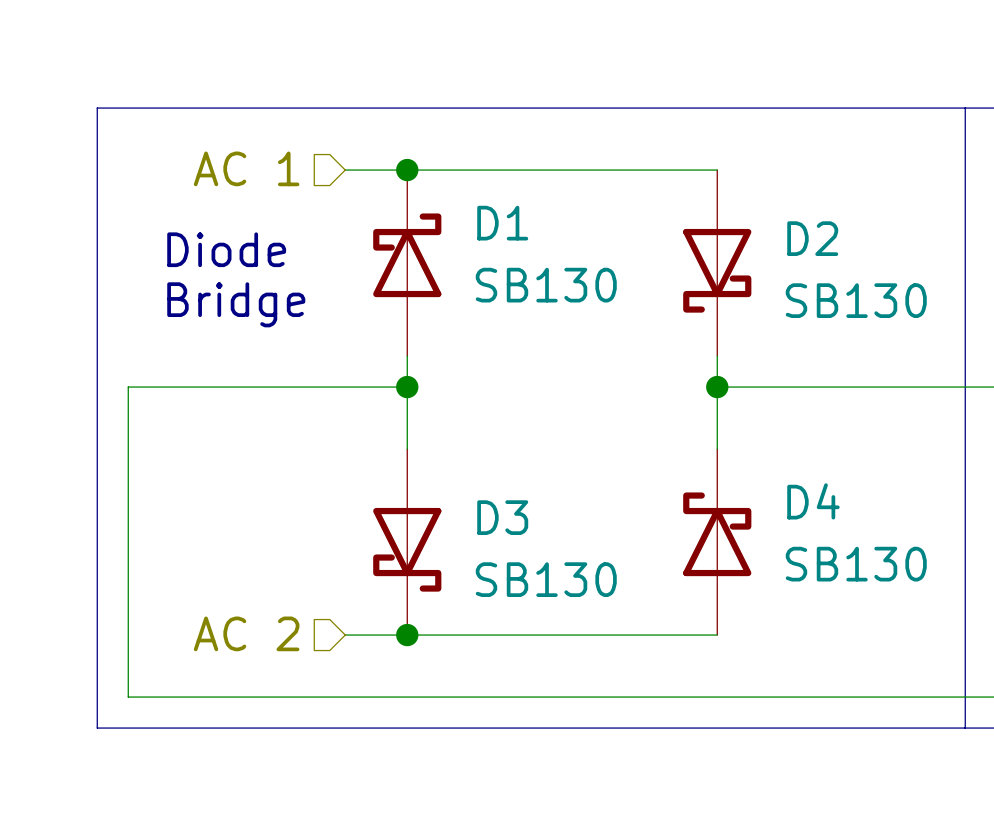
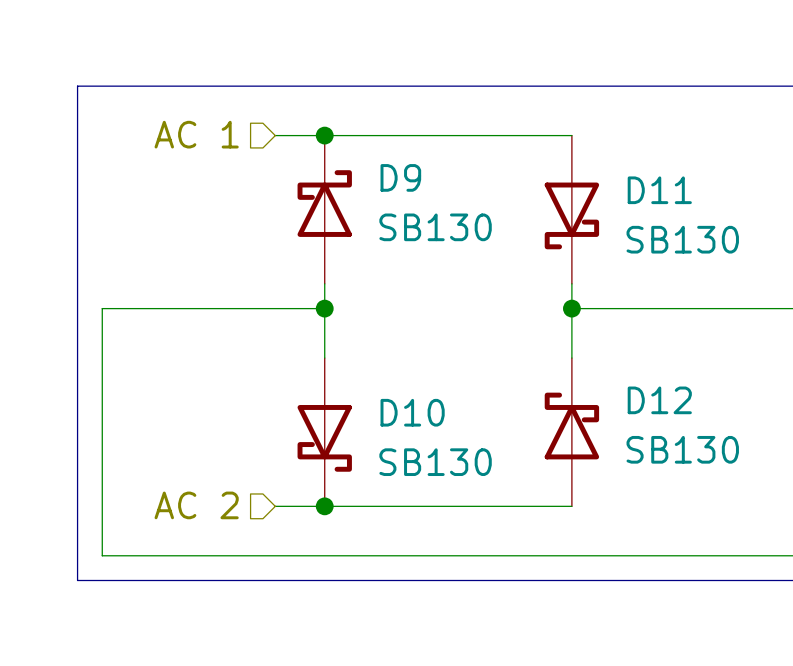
line: (965, 108) (965, 728) -> none
D1 name: D1 (502, 223) -> D9 (400, 177)
D2 name: D2 (812, 238) -> D11 (659, 190)
text: Diode (226, 249) -> none
text: Bridge (236, 304) -> none
D4 name: D4 (813, 501) -> D12 (659, 400)
D3 name: D3 (502, 517) -> D10 (412, 412)

